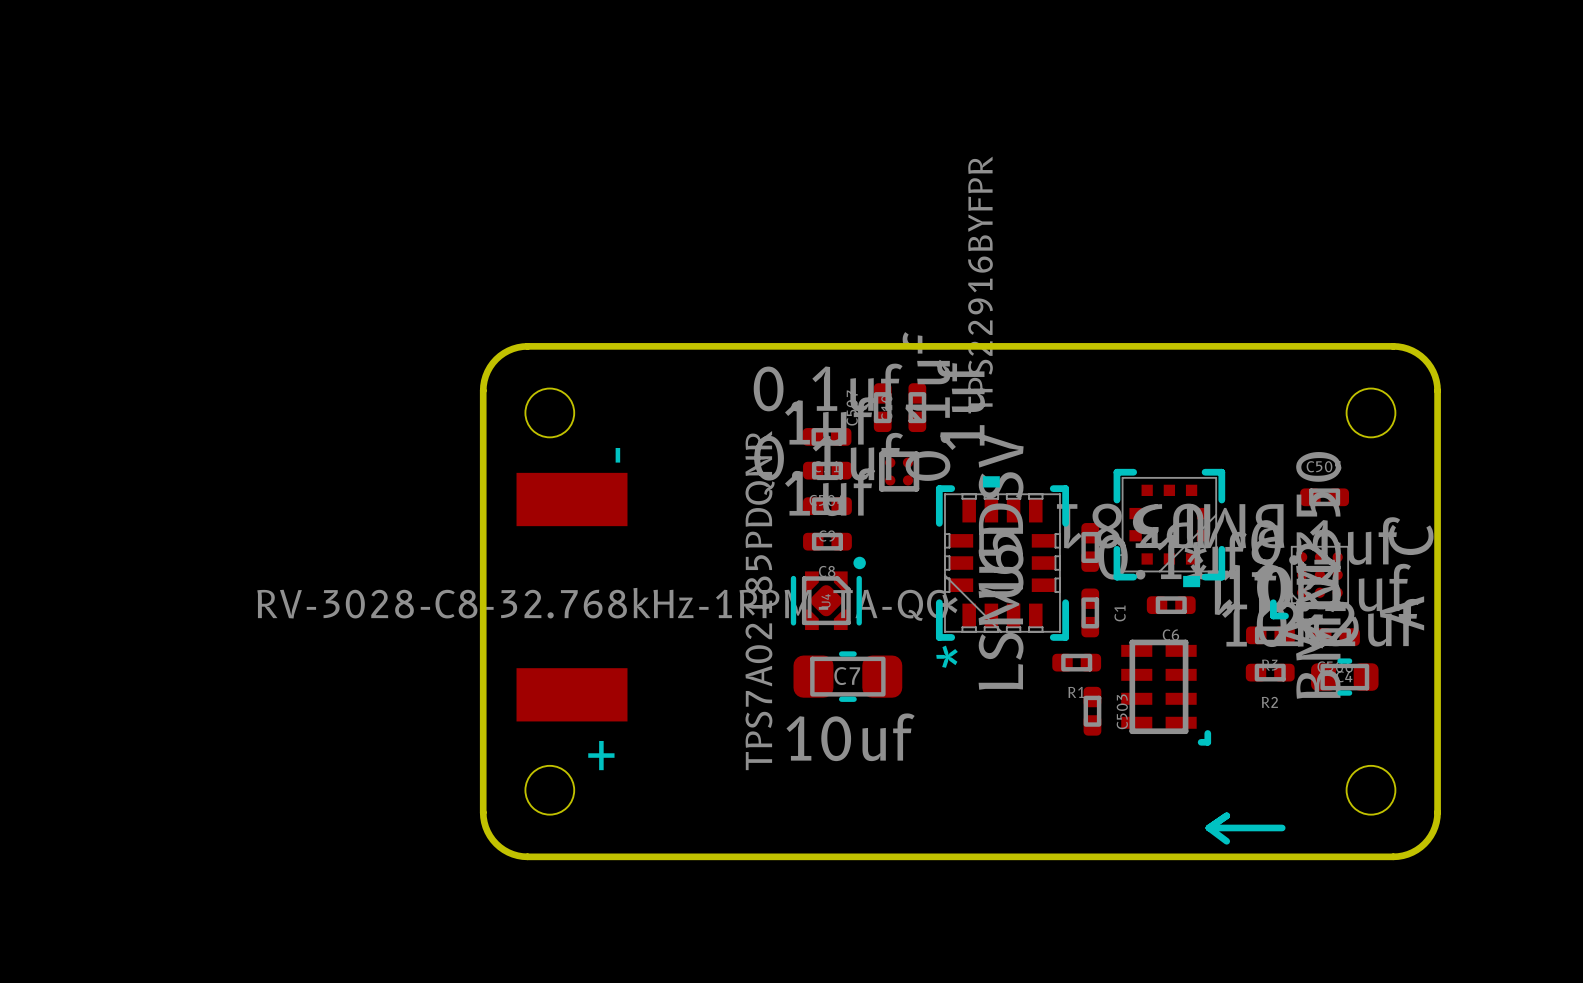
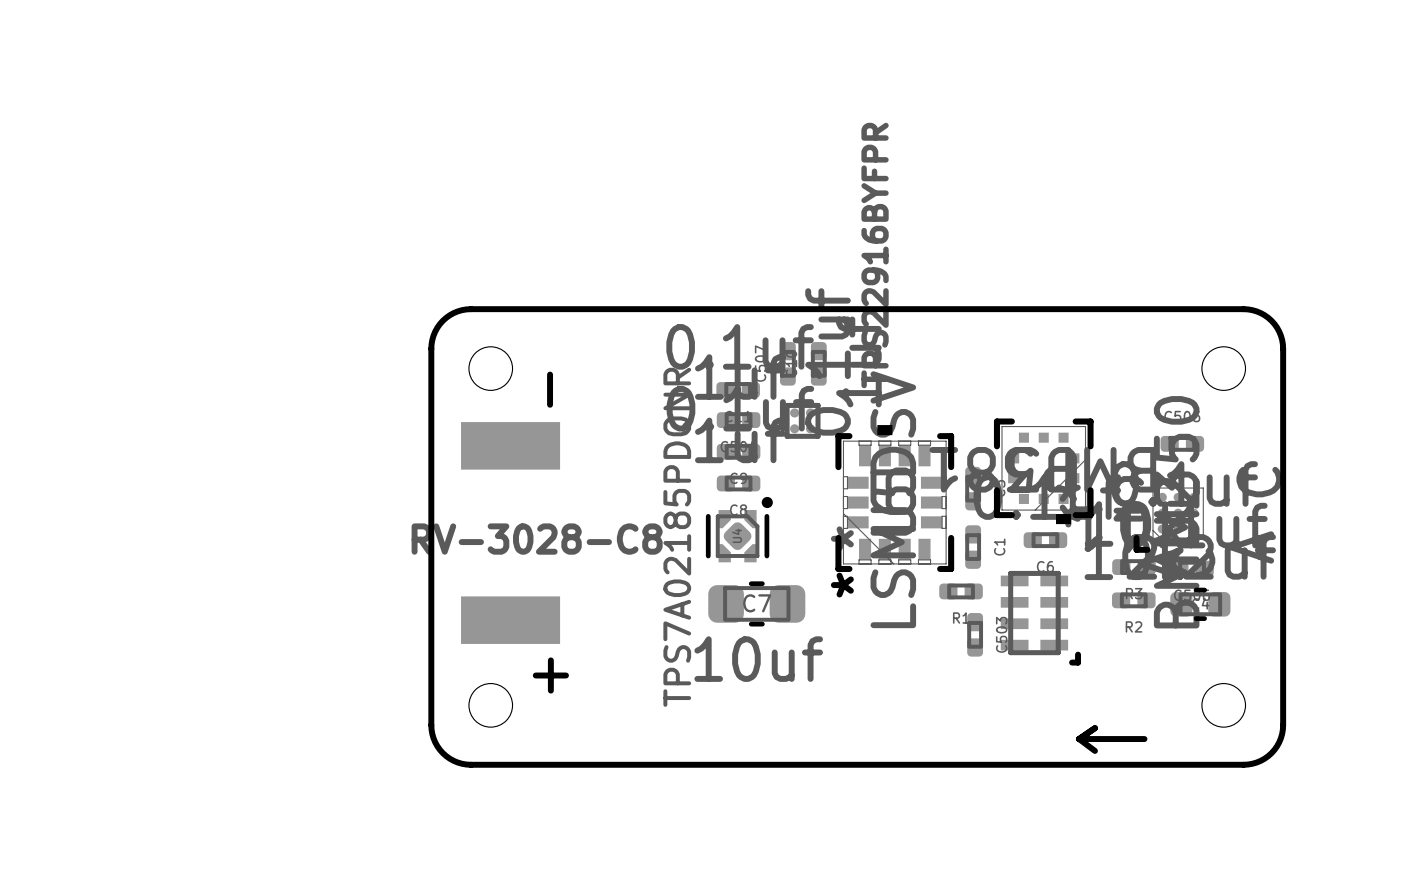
part value: RV-3028-C8-32.768kHz-1PPM-TA-QC (601, 604) -> RV-3028-C8 (537, 539)

